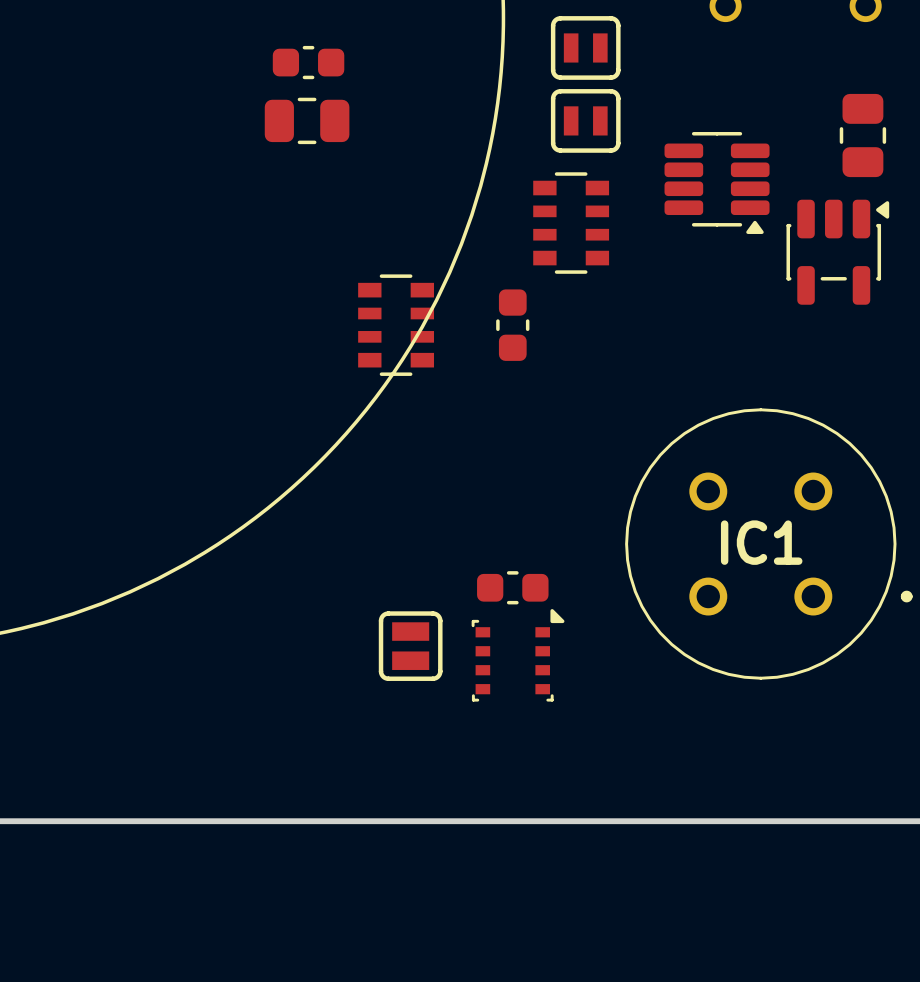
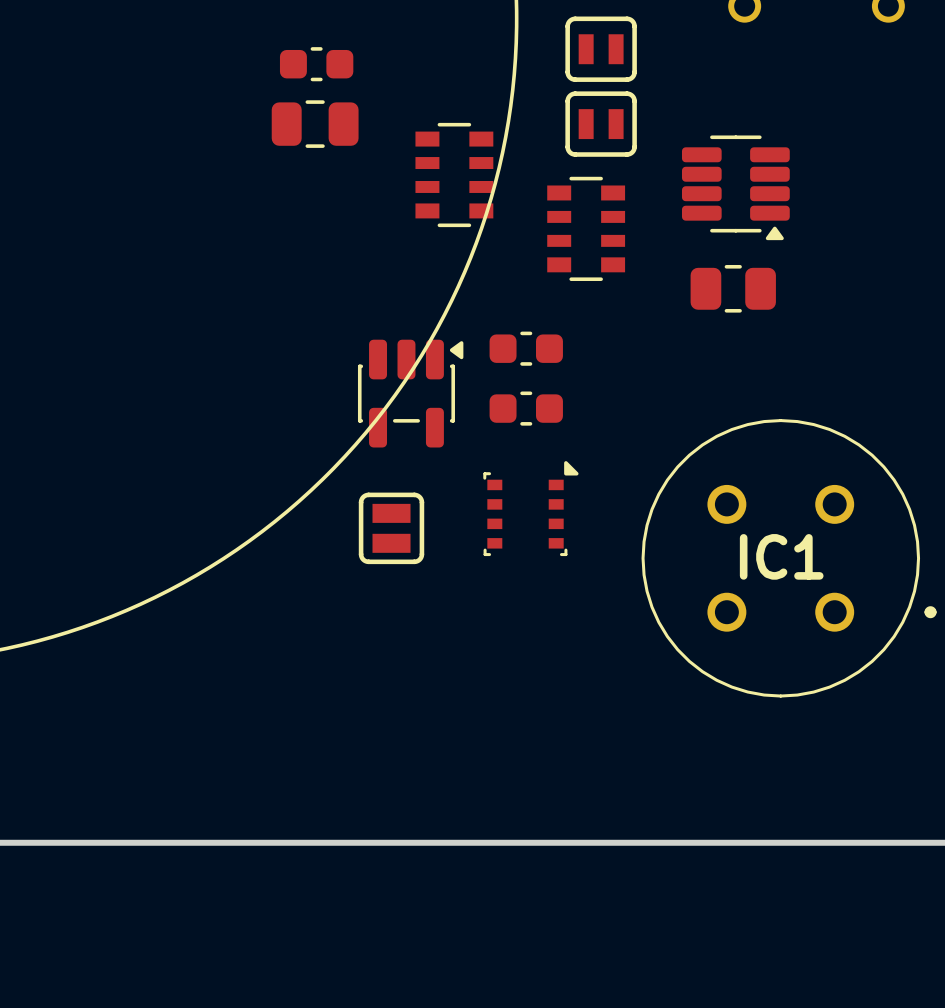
part rotation: 0° (862, 135) -> 90° clockwise (733, 288)
part position: (862, 135) -> (733, 288)
part position: (837, 252) -> (410, 393)
part position: (396, 325) -> (454, 175)
part rotation: 0° (512, 325) -> 90° clockwise (526, 348)
part position: (512, 587) -> (526, 408)
part position: (410, 646) -> (391, 528)
part position: (518, 655) -> (530, 508)

